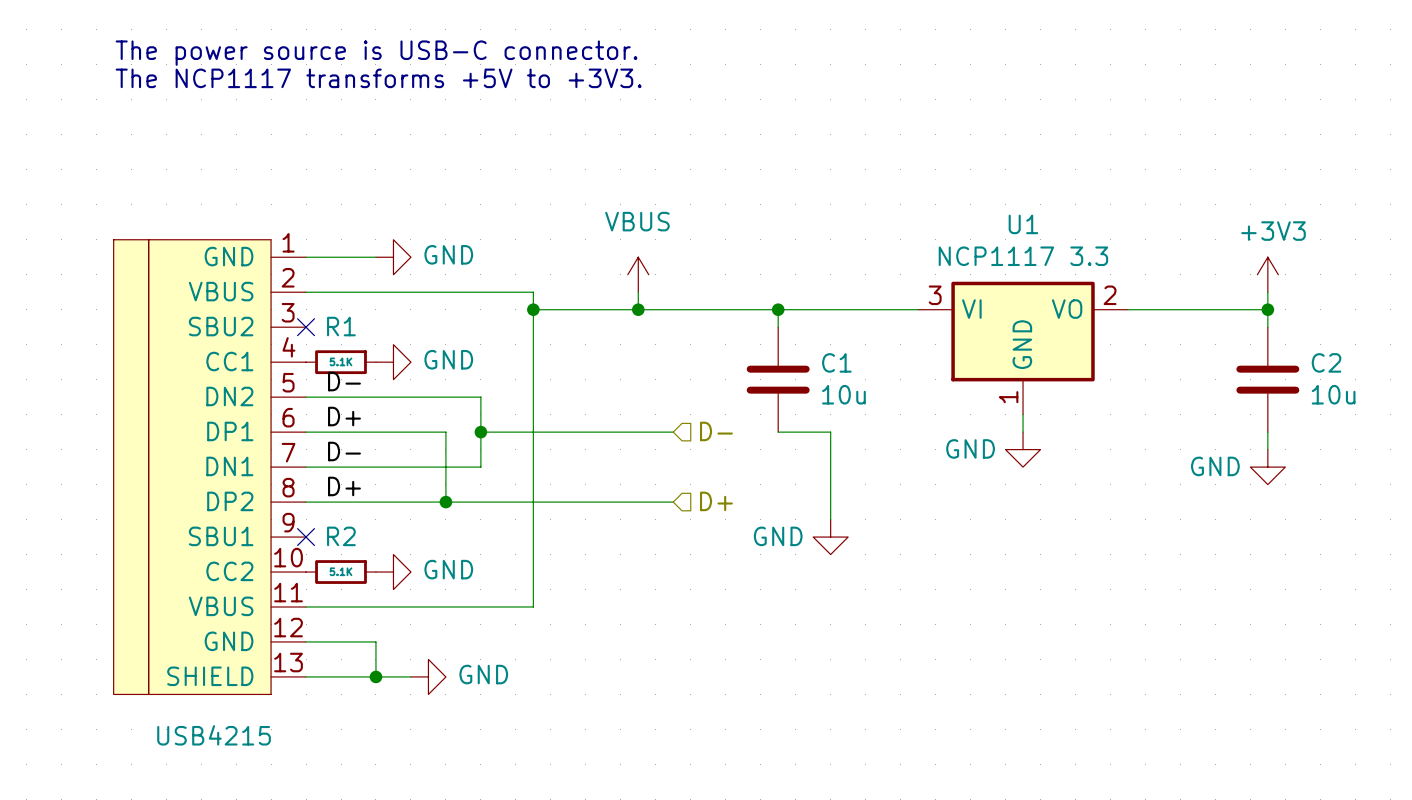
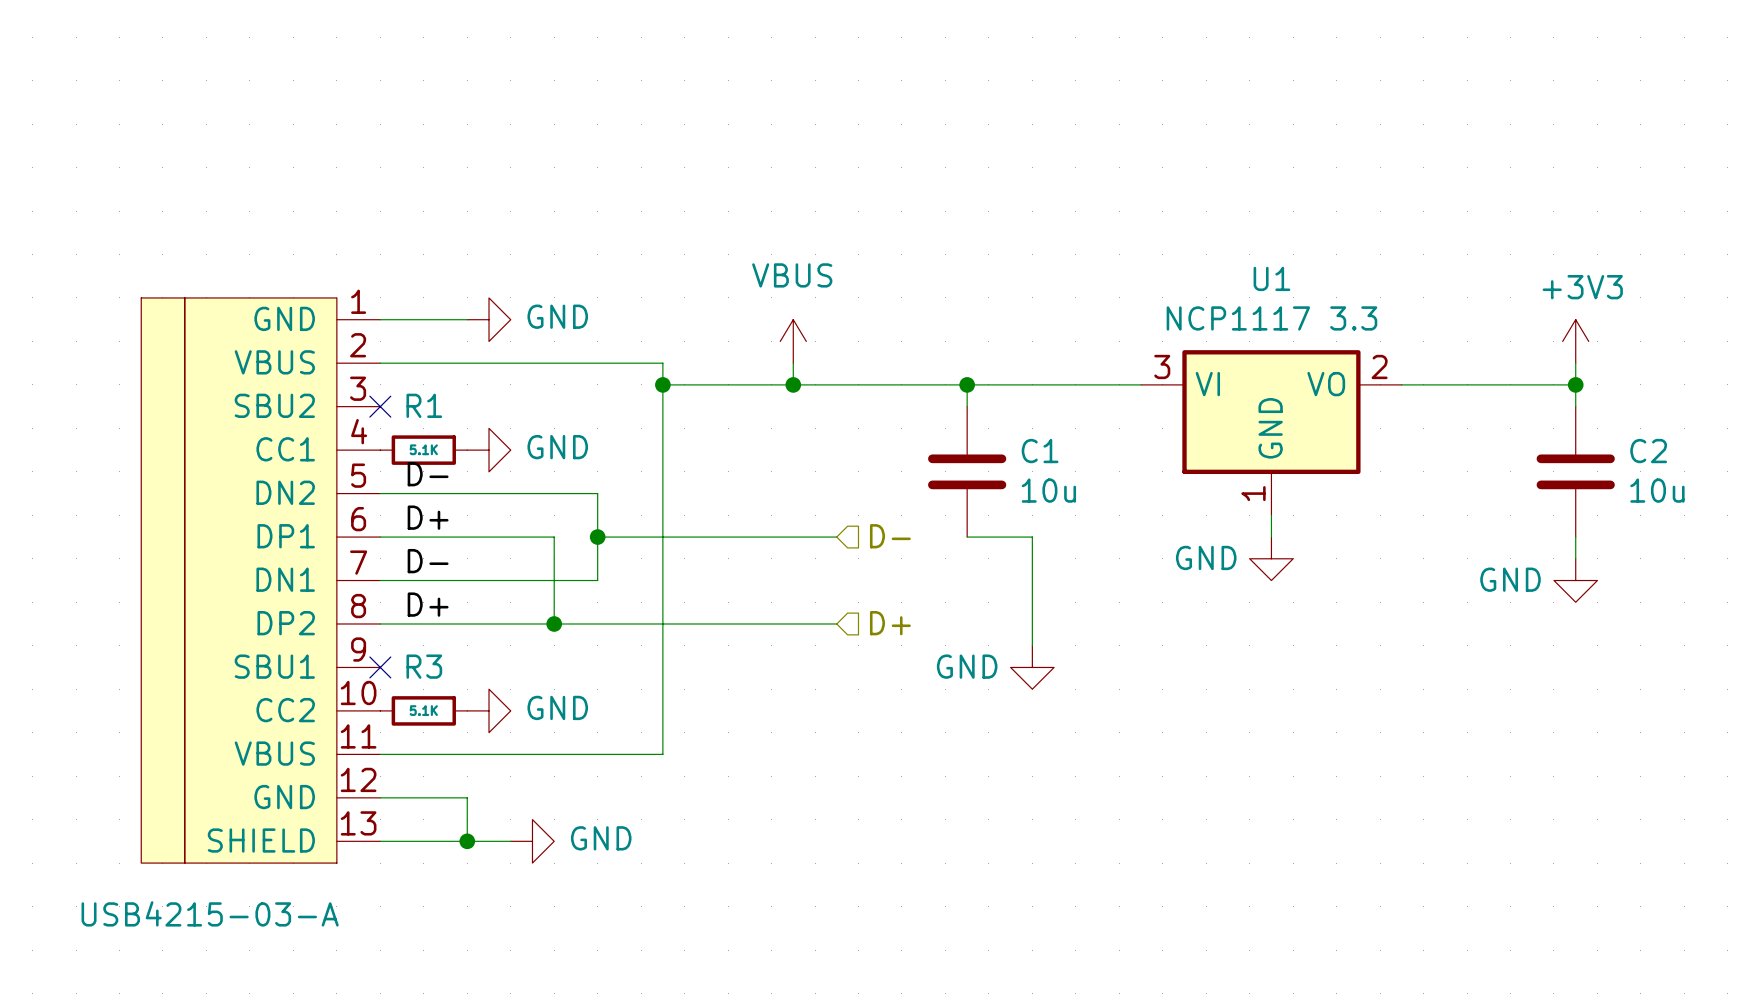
text: The power source is USB-C connector. (376, 53) -> none
text: The NCP1117 transforms +5V to +3V3. (378, 78) -> none
R2 name: R2 (341, 536) -> R3 (424, 666)
part value: USB4215 (214, 735) -> USB4215-03-A (210, 913)

